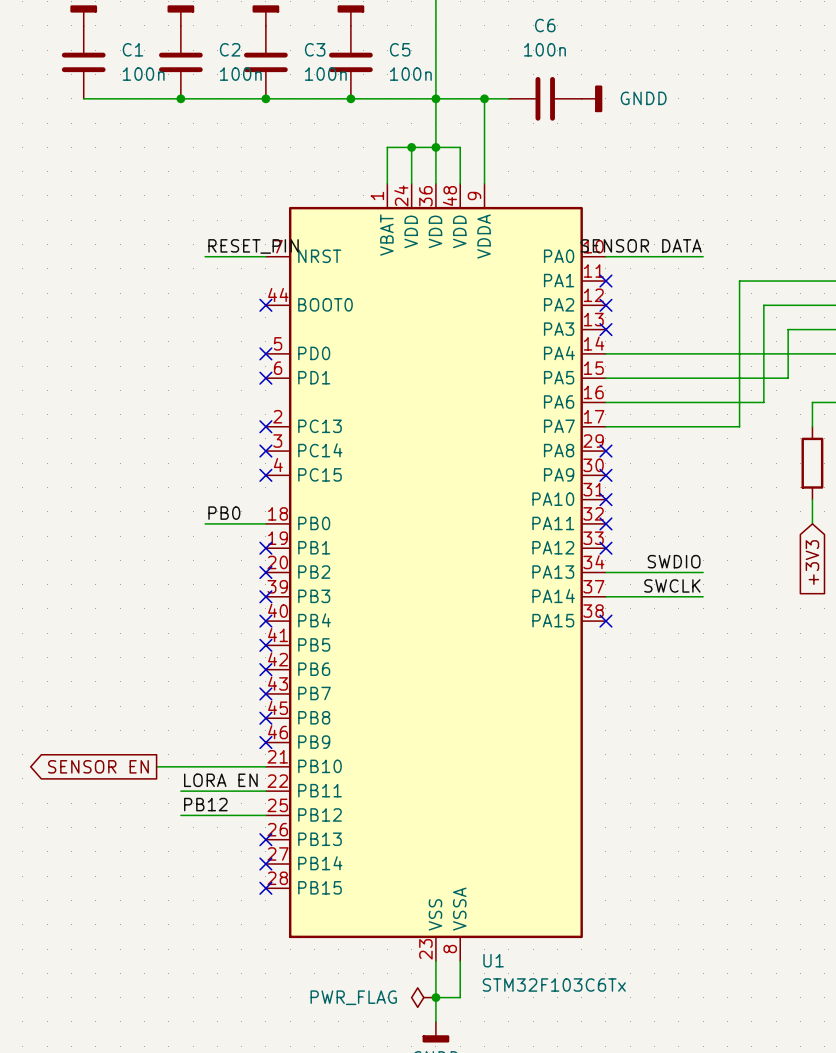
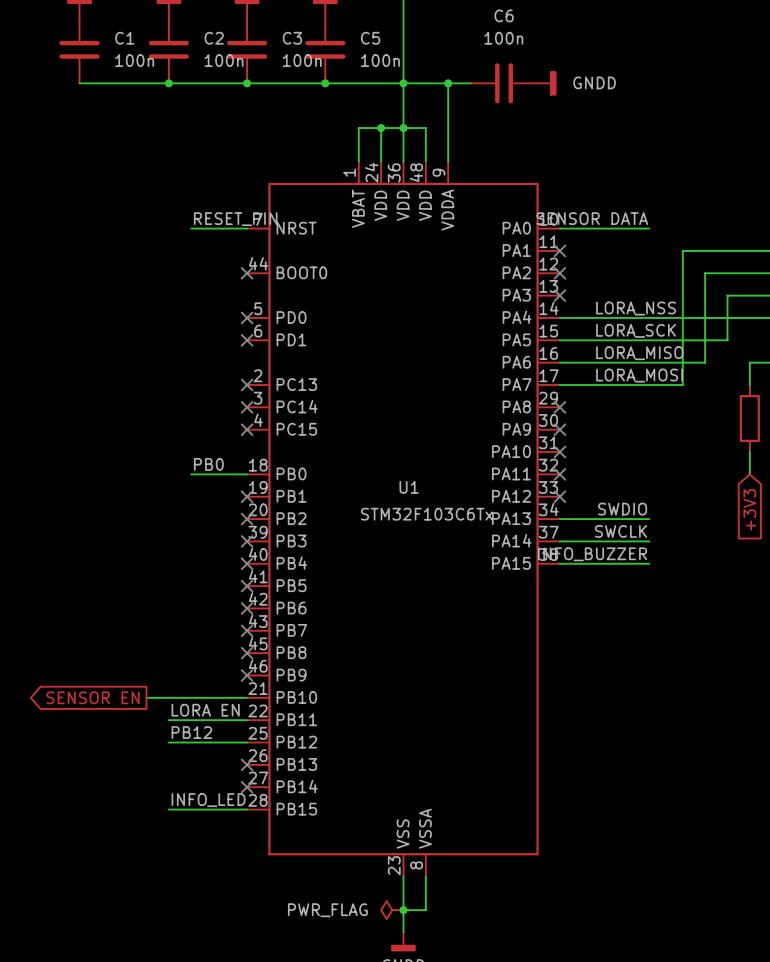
label: none -> LORA_NSS (636, 308)
label: none -> LORA_SCK (636, 330)
label: none -> LORA_MISO (639, 353)
label: none -> LORA_MOSI (639, 375)
label: none -> INFO_BUZZER (592, 554)
wire: none -> (559, 563) (649, 563)
no-connect mark: (605, 621) -> none
label: none -> INFO_LED (208, 800)
wire: none -> (168, 809) (247, 809)
no-connect mark: (265, 888) -> none
U1 name position: U1 (493, 960) -> U1 (409, 487)
U1 value position: STM32F103C6Tx (554, 985) -> STM32F103C6Tx (426, 514)

